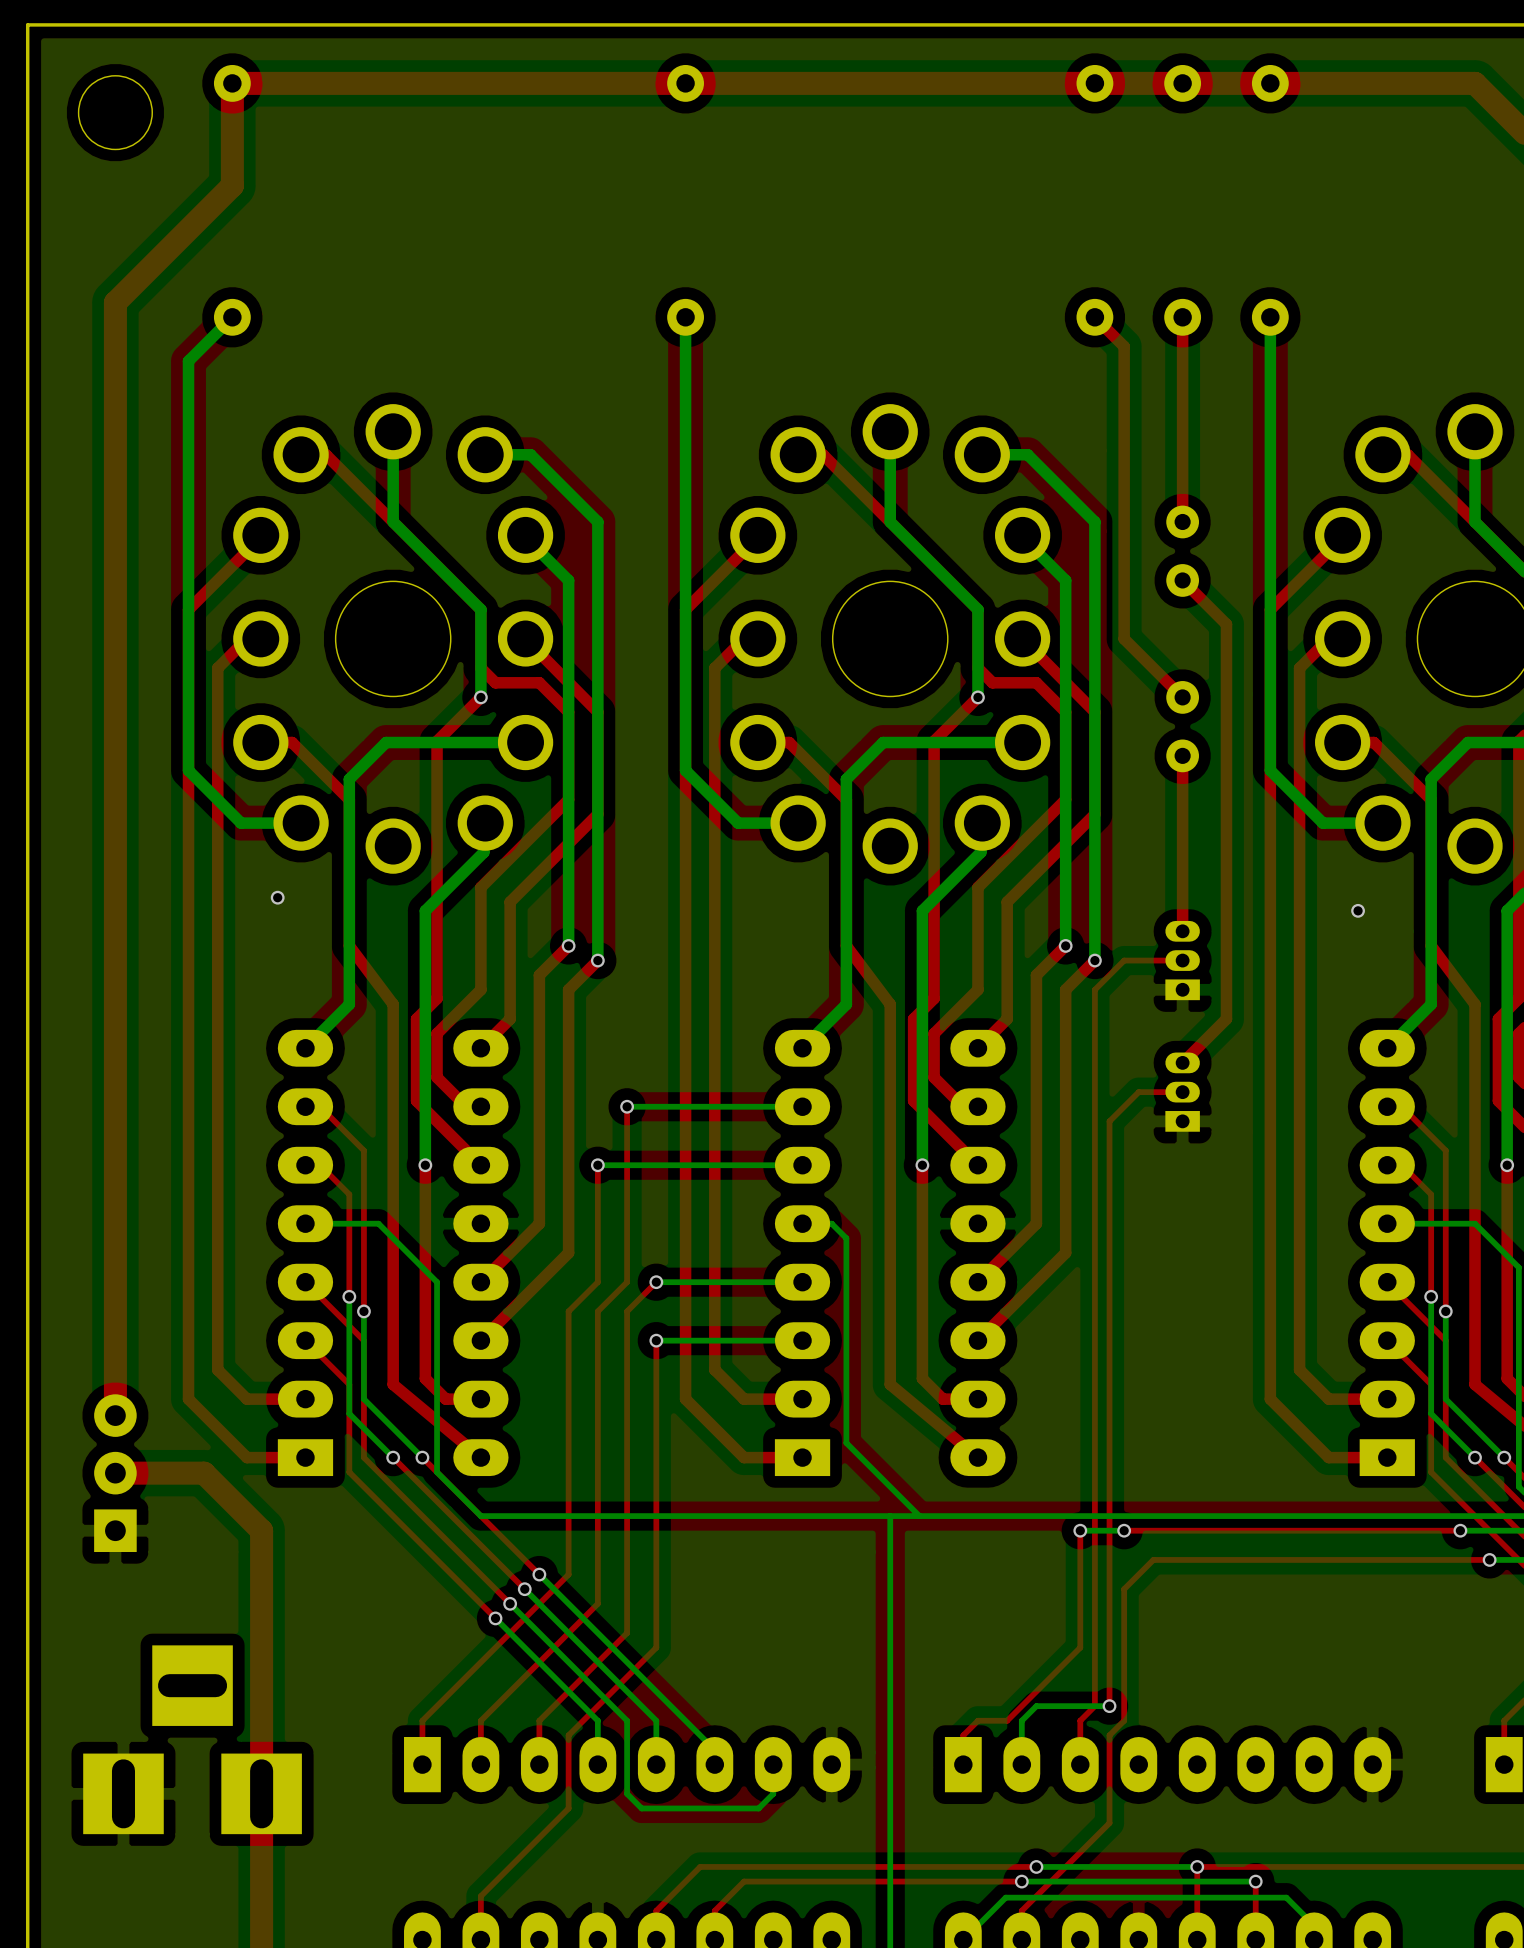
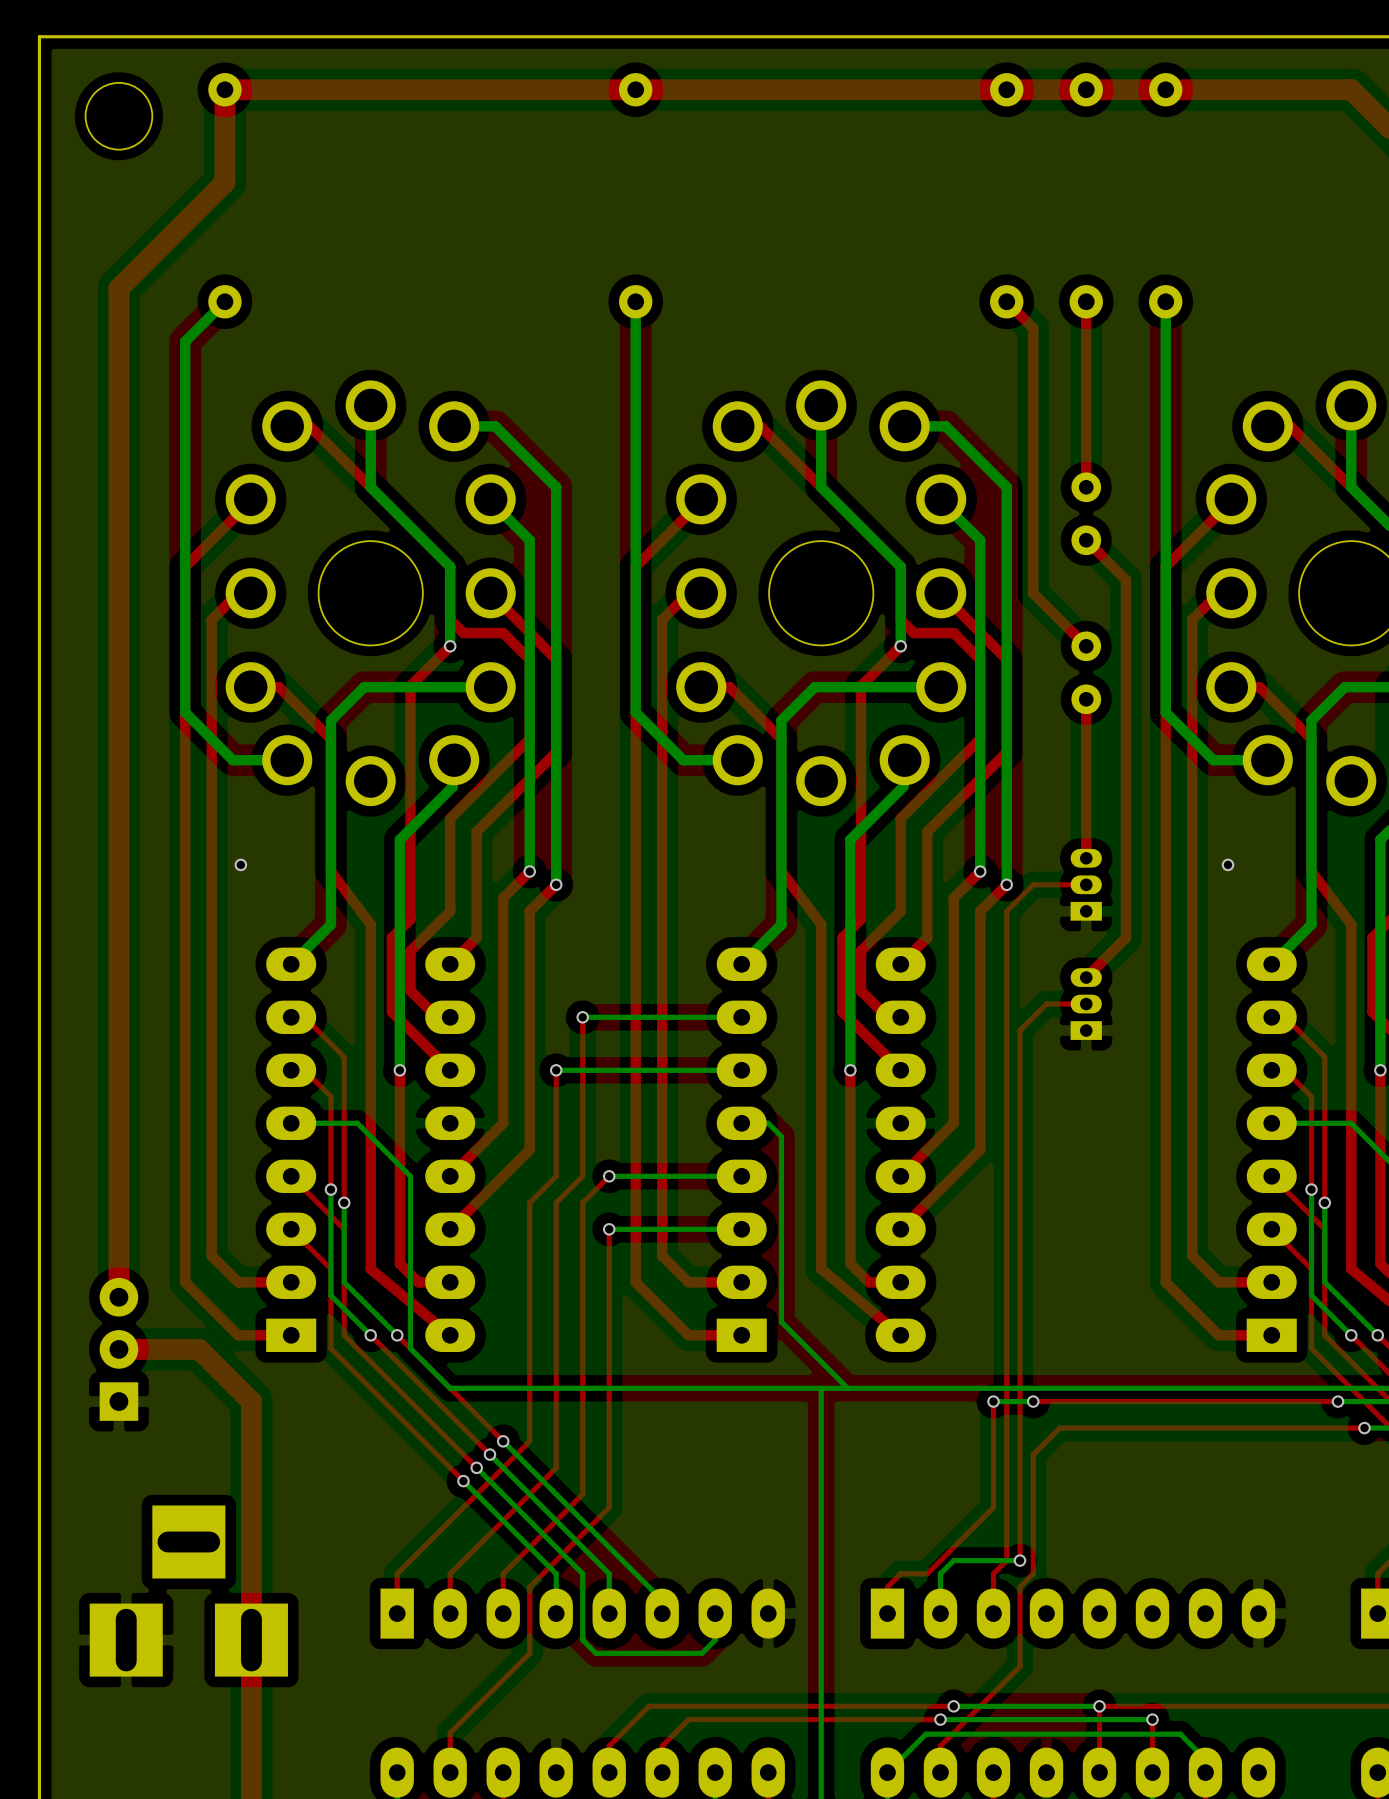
via position: (277, 897) -> (240, 864)
via position: (1358, 910) -> (1228, 864)

